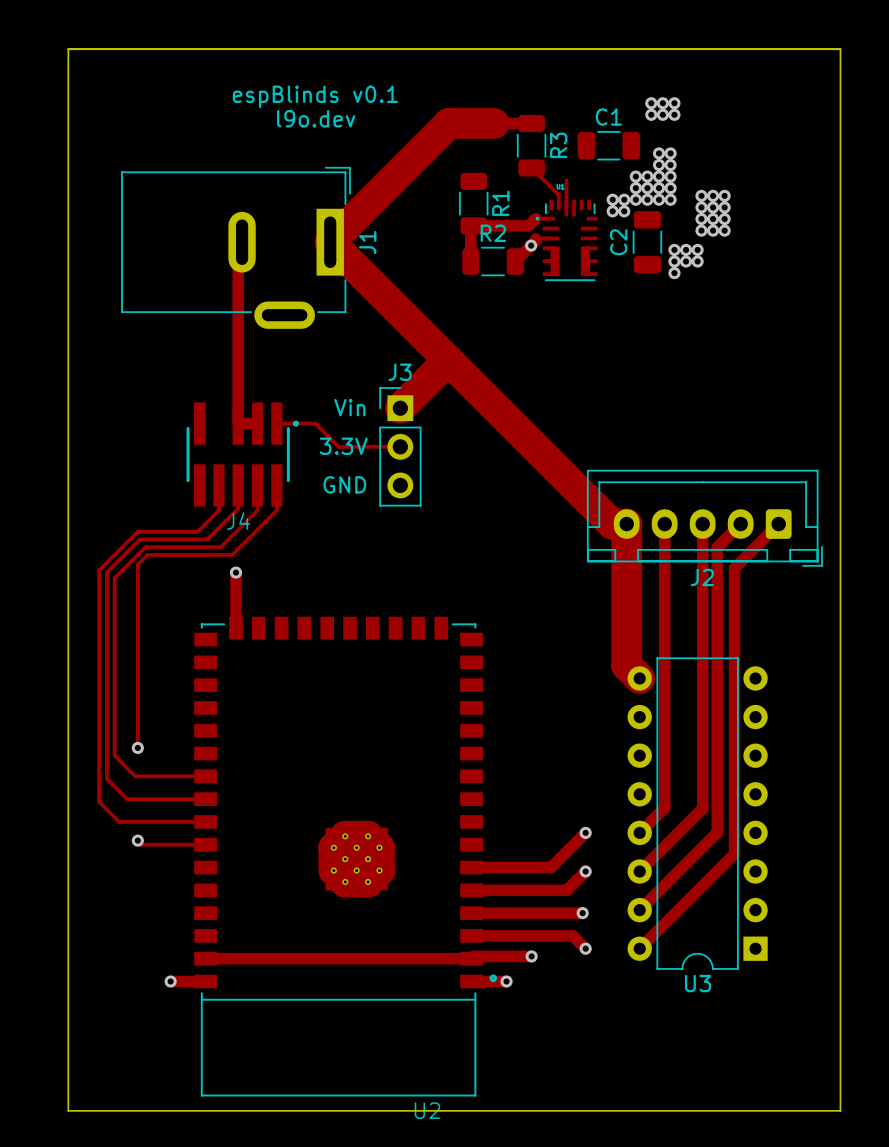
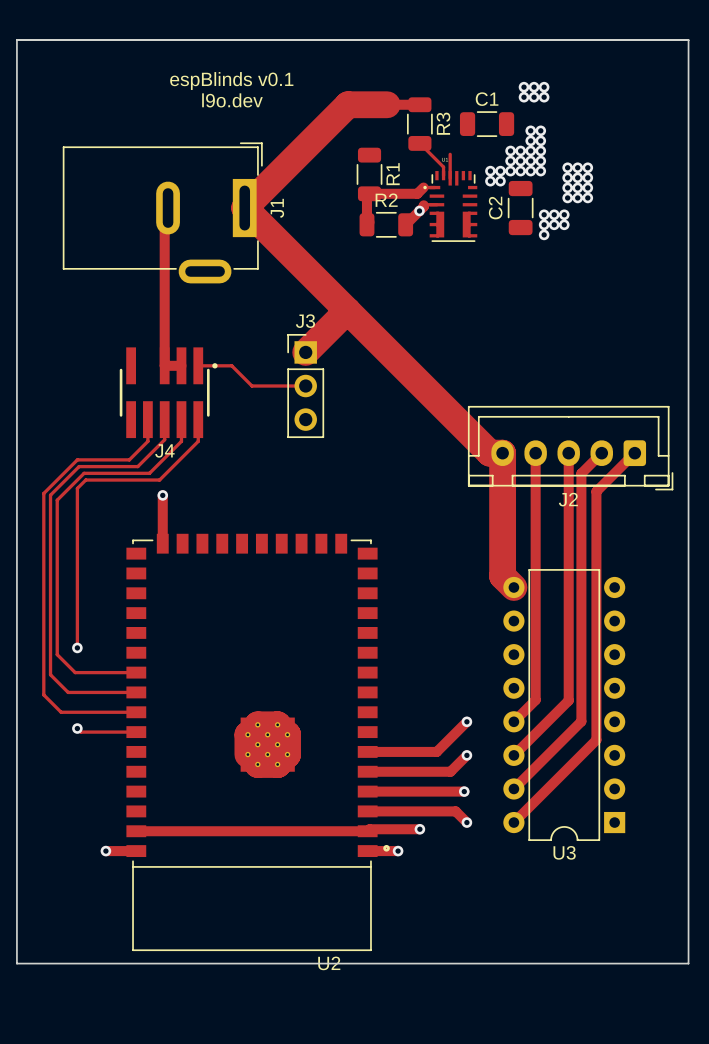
text: Vin (349, 407) -> none
text: 3.3V (343, 446) -> none
text: GND (344, 484) -> none

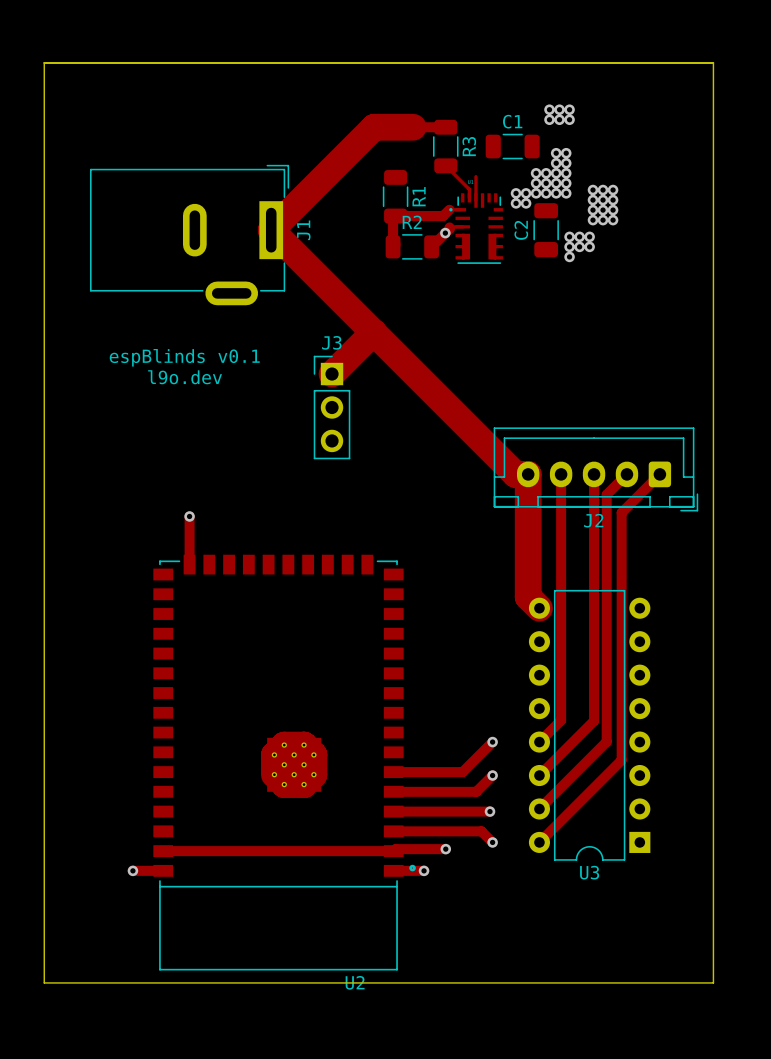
text position: espBlinds v0.1 (231, 81) -> espBlinds v0.1 (184, 357)
text position: l9o.dev (232, 100) -> l9o.dev (185, 377)
track: (168, 208) (164, 211) (164, 365) (181, 365) -> none
track: (198, 365) (231, 365) (252, 386) (305, 386) -> none
J4: (168, 392) -> none
track: (147, 419) (147, 441) (129, 459) (77, 459) (43, 493) (43, 694) (61, 712) (136, 712) -> none
track: (164, 419) (164, 439) (137, 466) (79, 466) (50, 495) (50, 674) (68, 692) (136, 692) -> none
track: (181, 419) (181, 441) (149, 473) (84, 473) (57, 500) (57, 654) (75, 672) (136, 672) -> none
track: (198, 419) (198, 441) (159, 480) (85, 480) (77, 488) (77, 647) -> none
via: (77, 647) -> none
track: (77, 728) (80, 732) (136, 732) -> none
via: (77, 728) -> none

